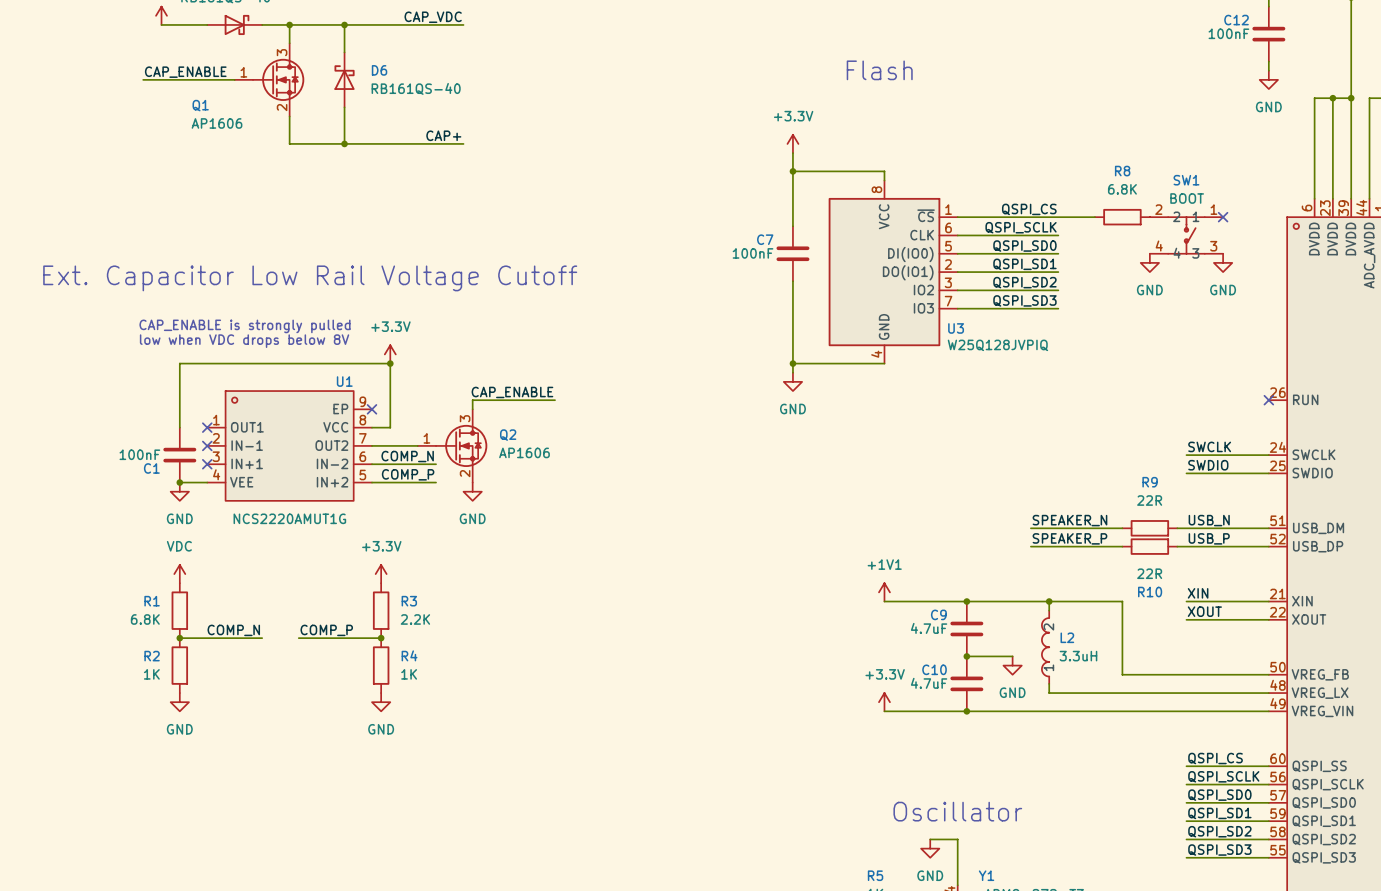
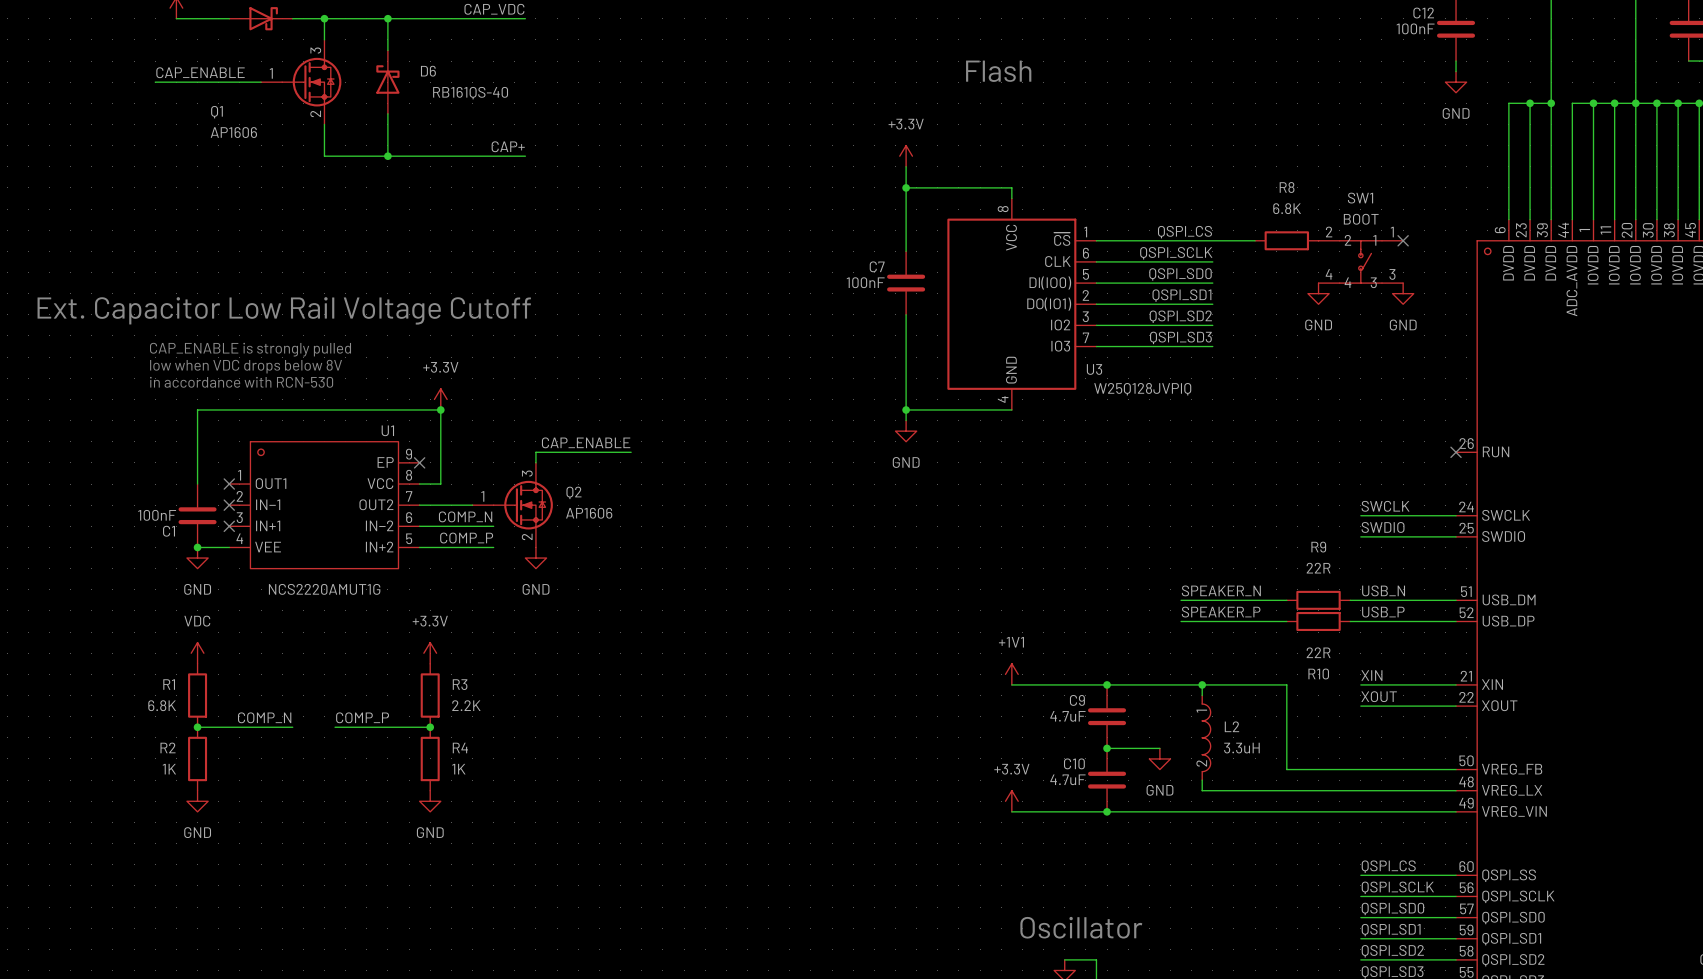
text: none -> CAP_ENABLE is strongly pulled (250, 349)
text: CAP_ENABLE is strongly pulled (244, 326) -> low when VDC drops below 8V (246, 366)
text: low when VDC drops below 8V (244, 341) -> in accordance with RCN-530 (241, 382)
L2 rotation: 0° (1045, 647) -> 180° (1206, 737)

